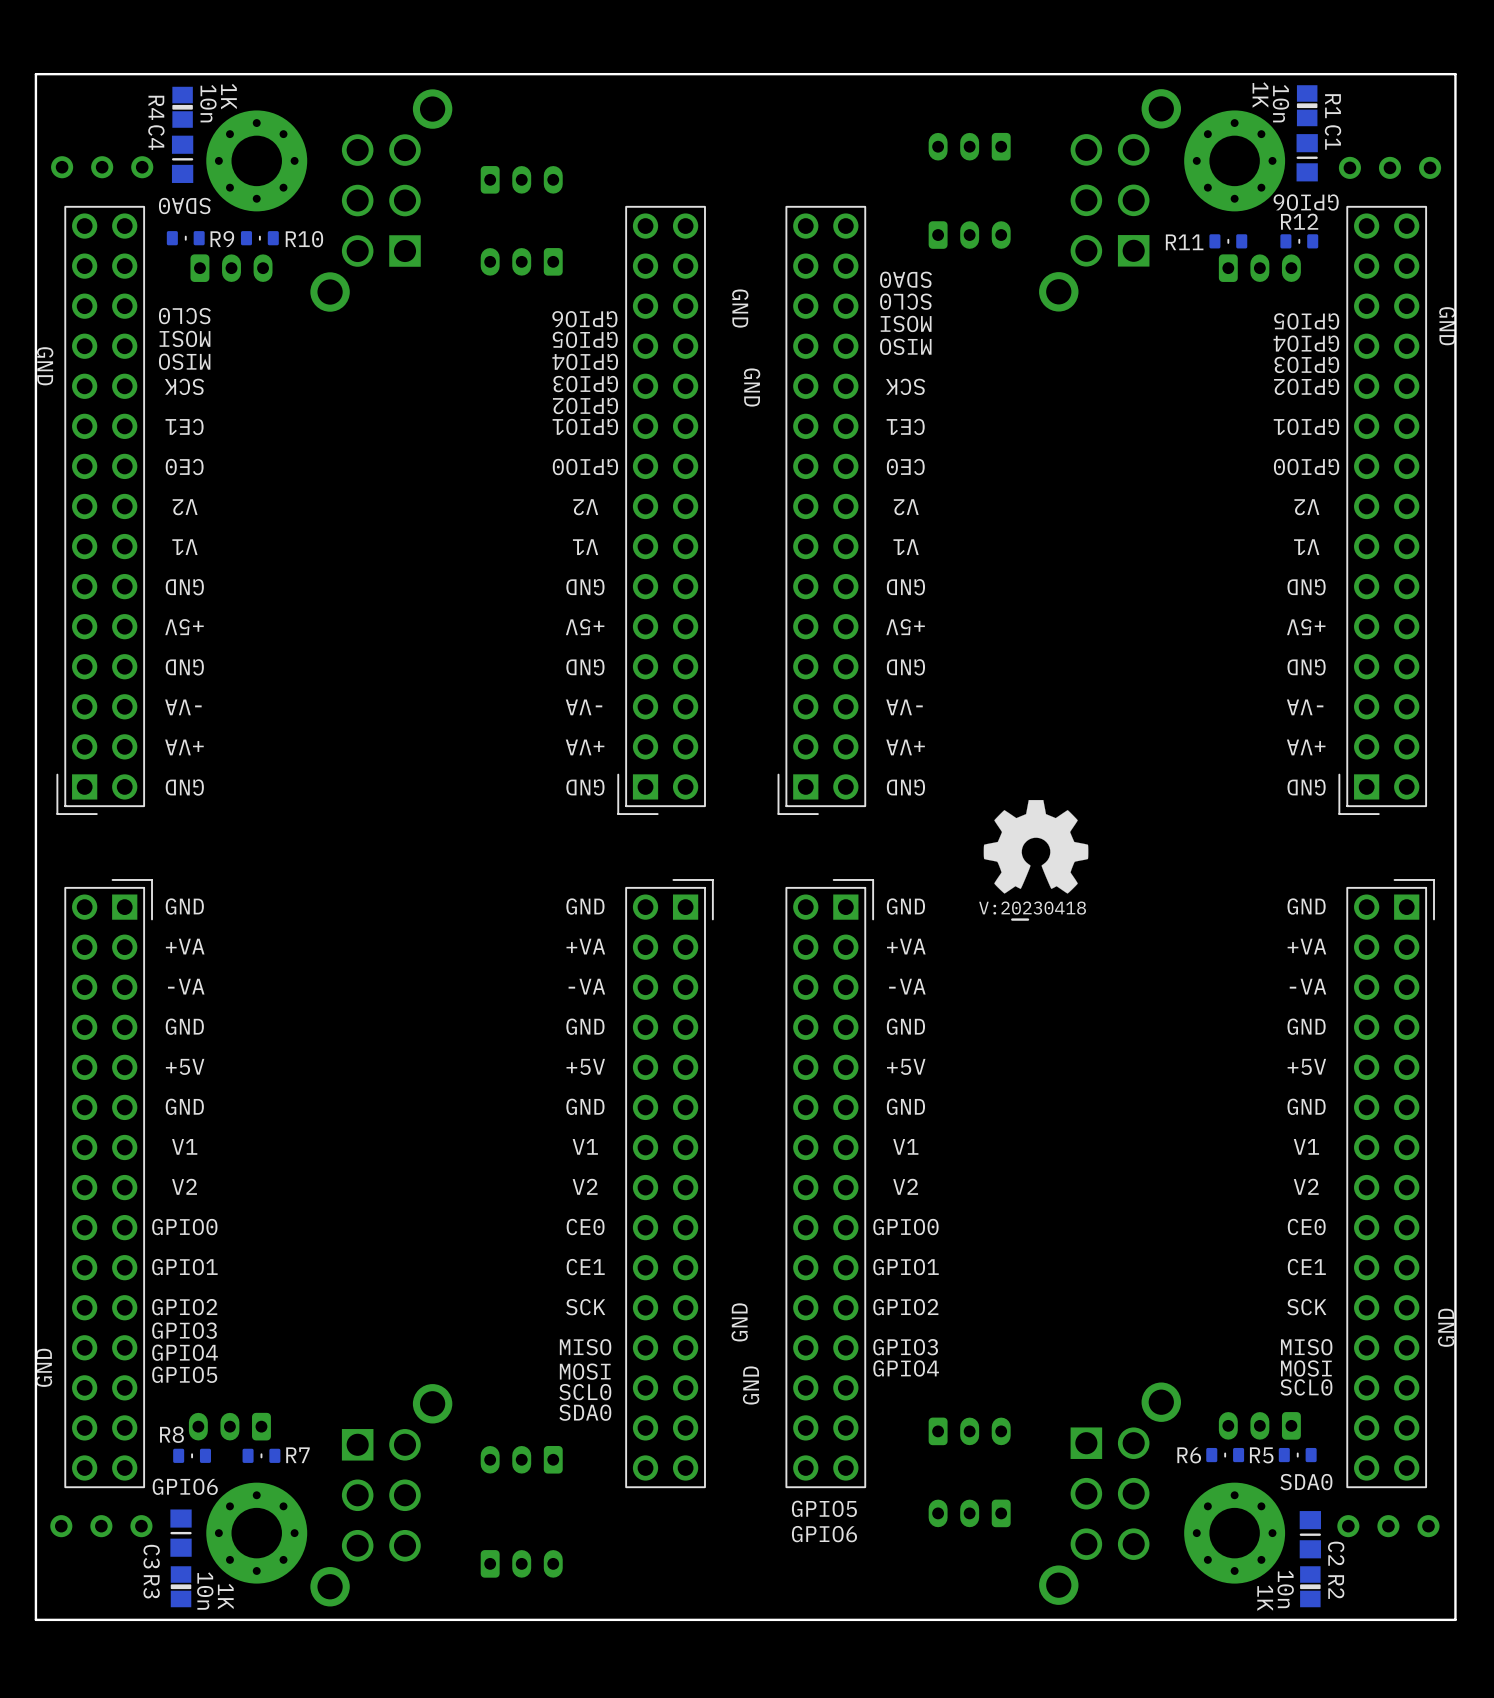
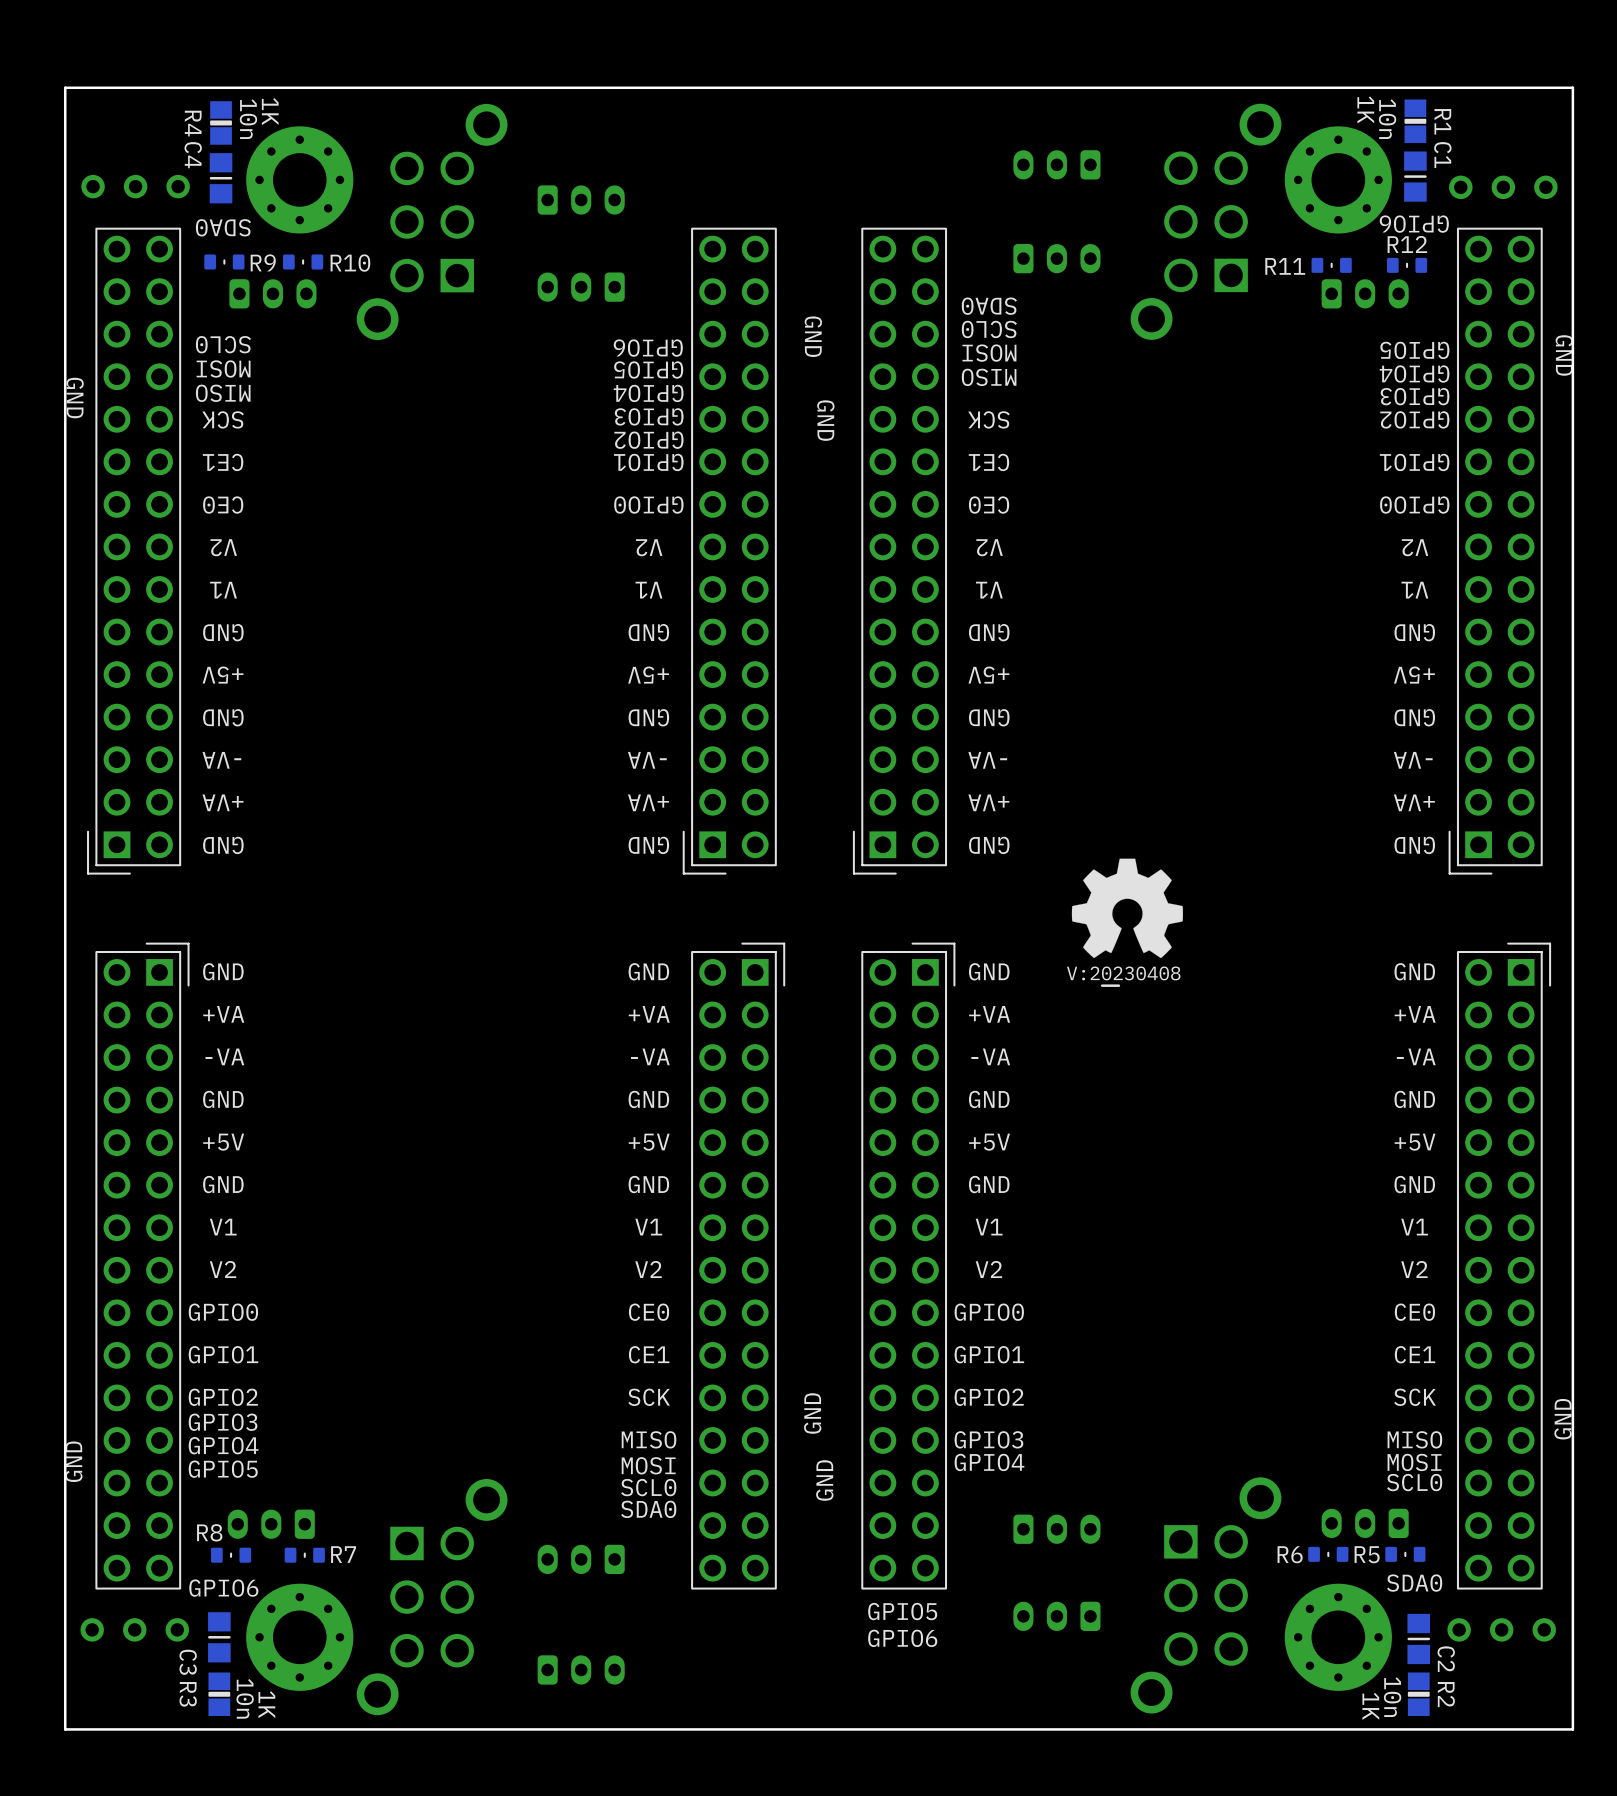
drawing shape: [979, 901, 1086, 921] -> [1067, 966, 1181, 987]

